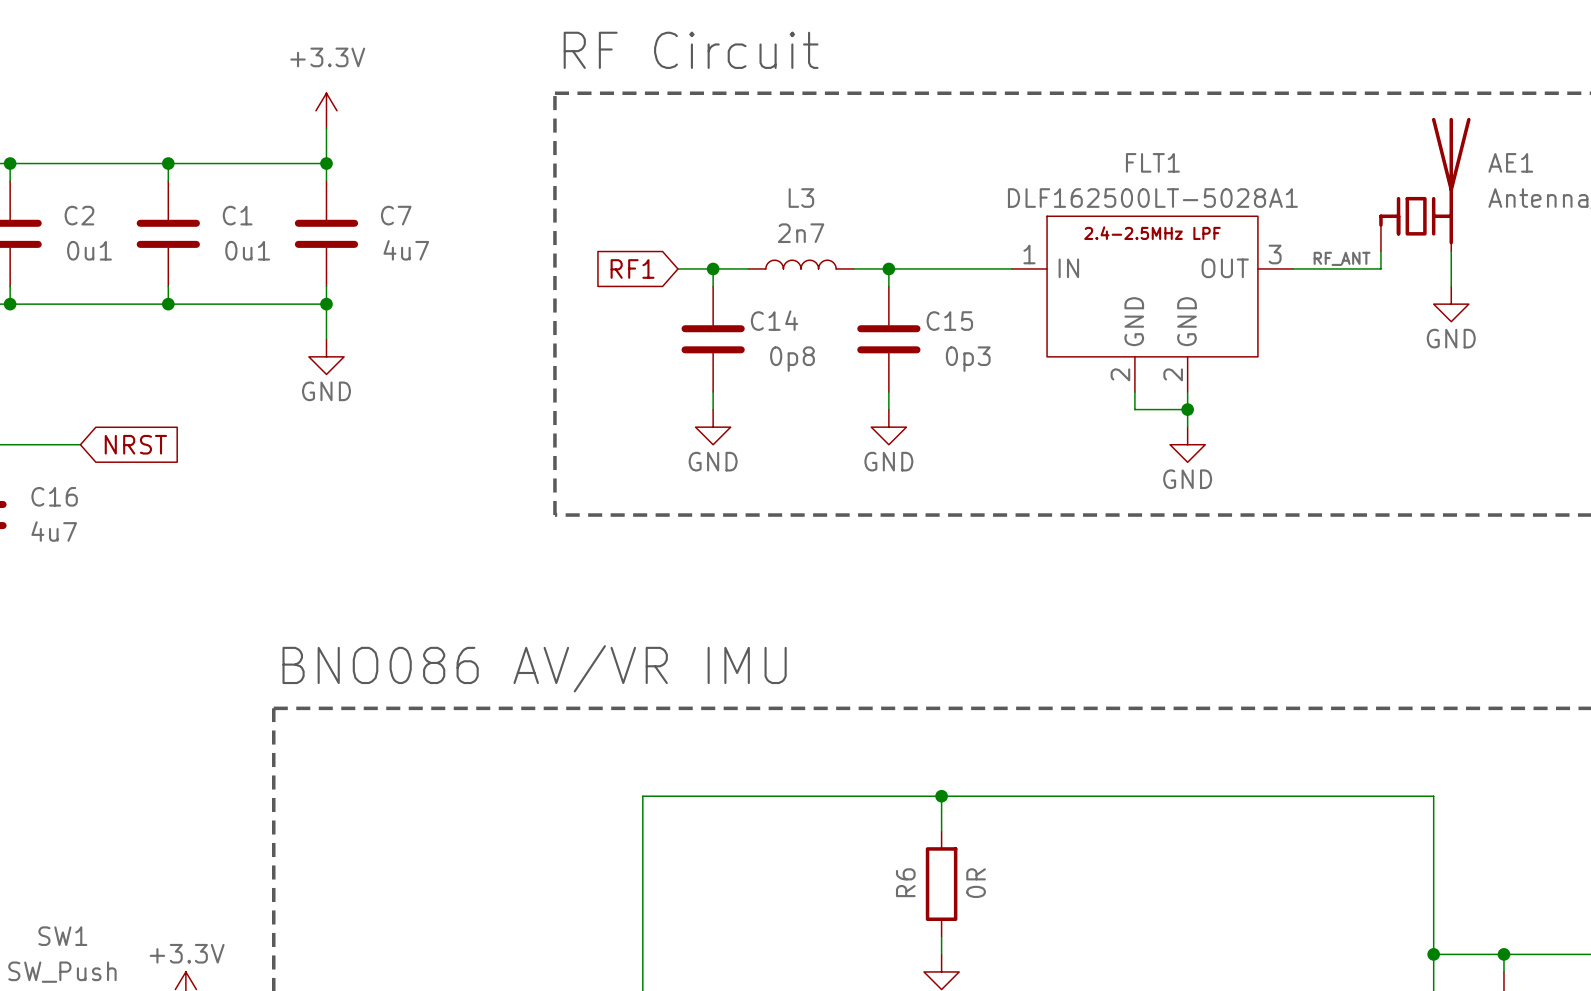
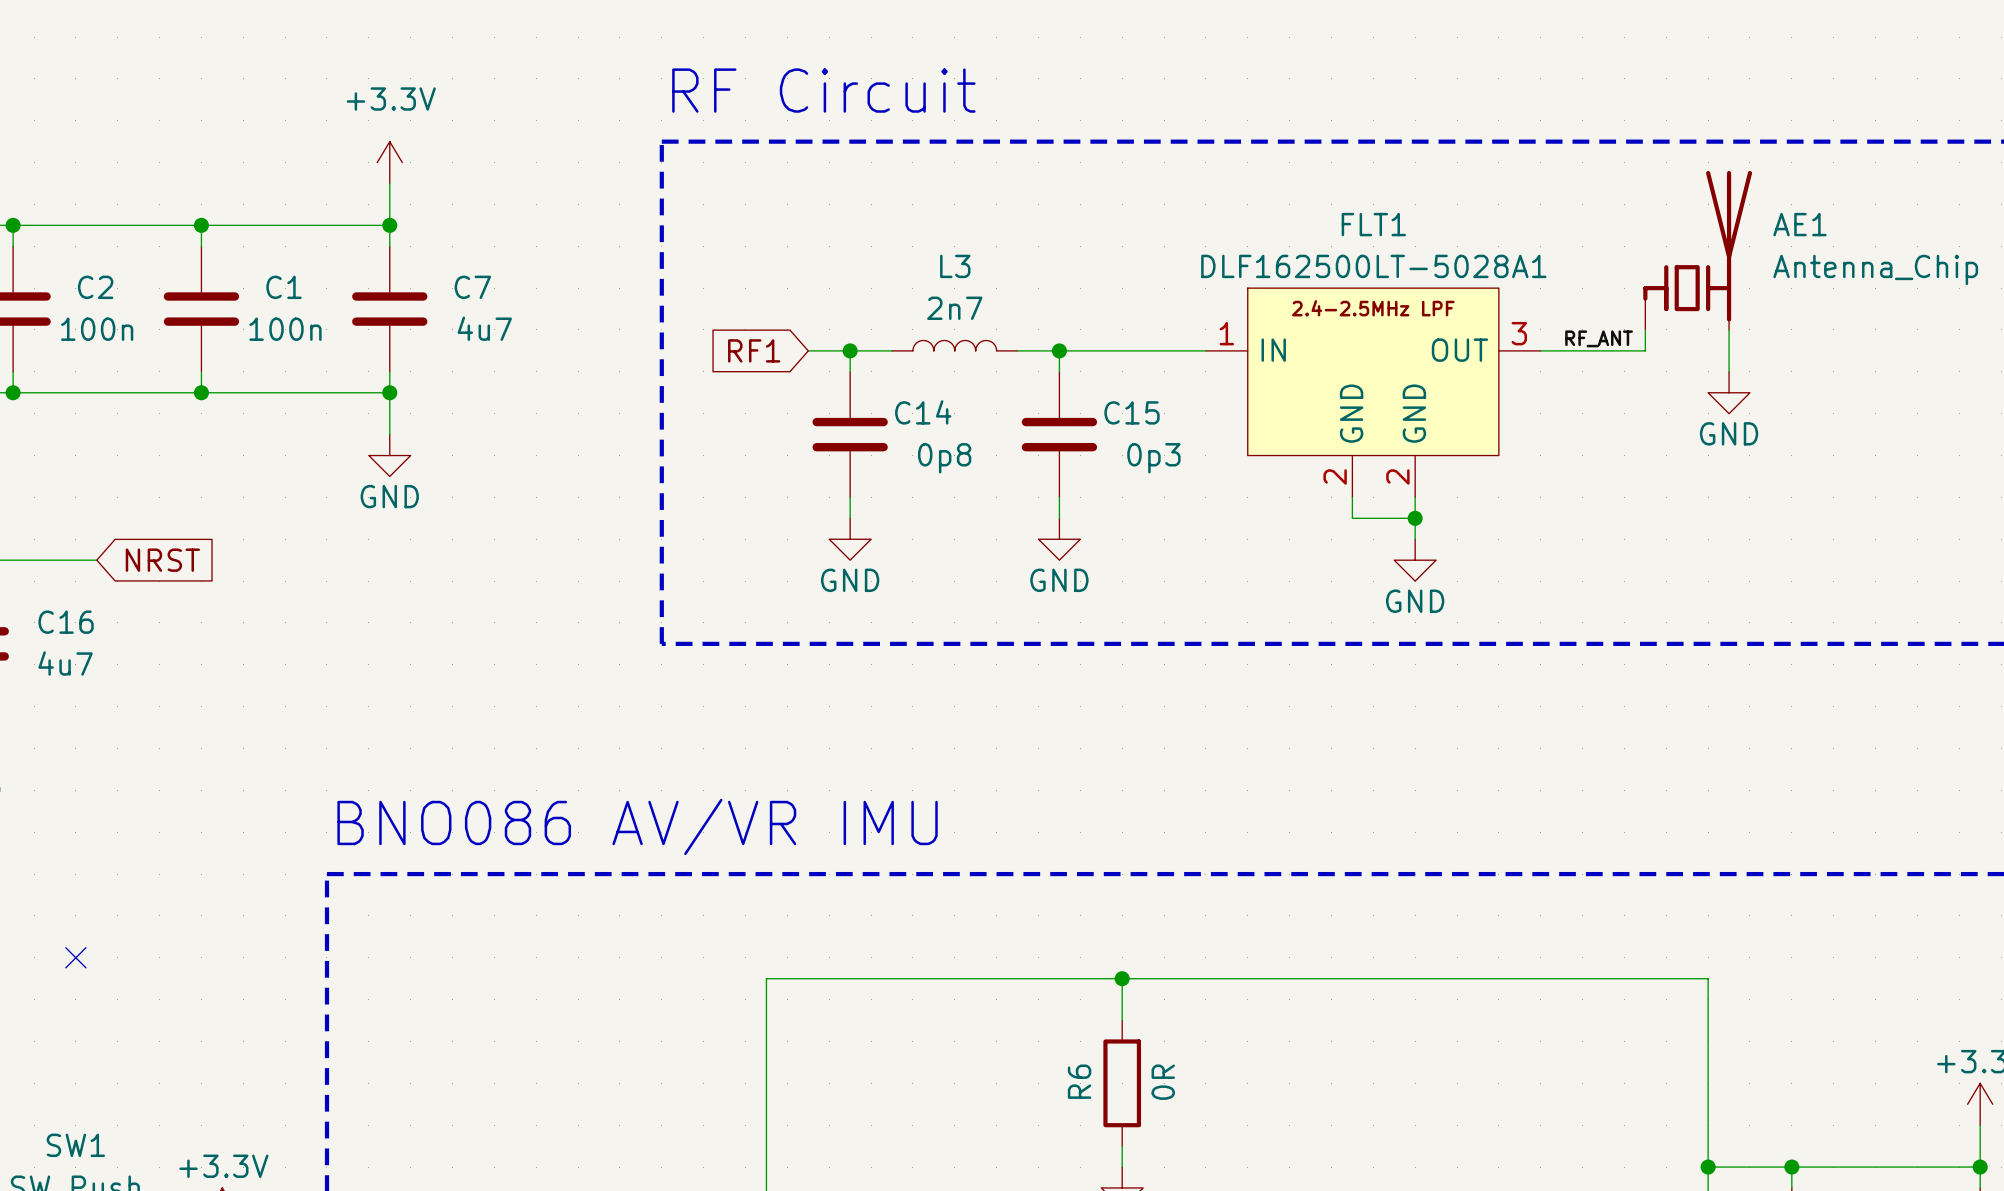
C2 value: 0u1 (89, 250) -> 100n (97, 329)
C1 value: 0u1 (247, 250) -> 100n (285, 329)
no-connect mark: none -> (75, 957)

